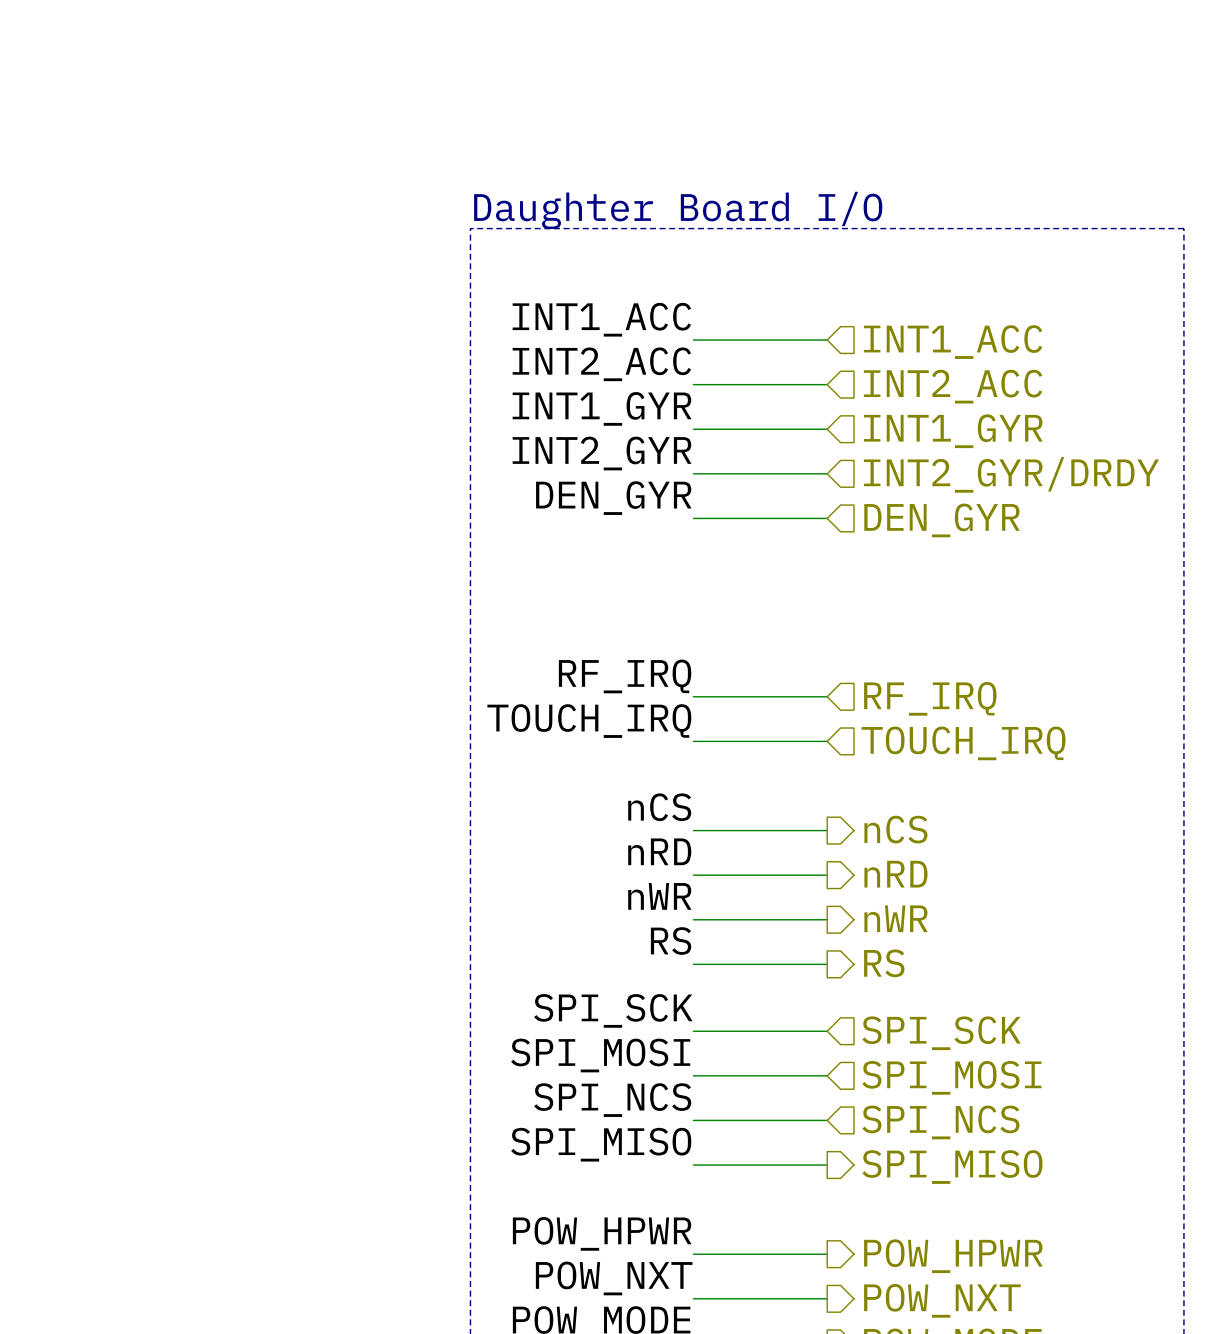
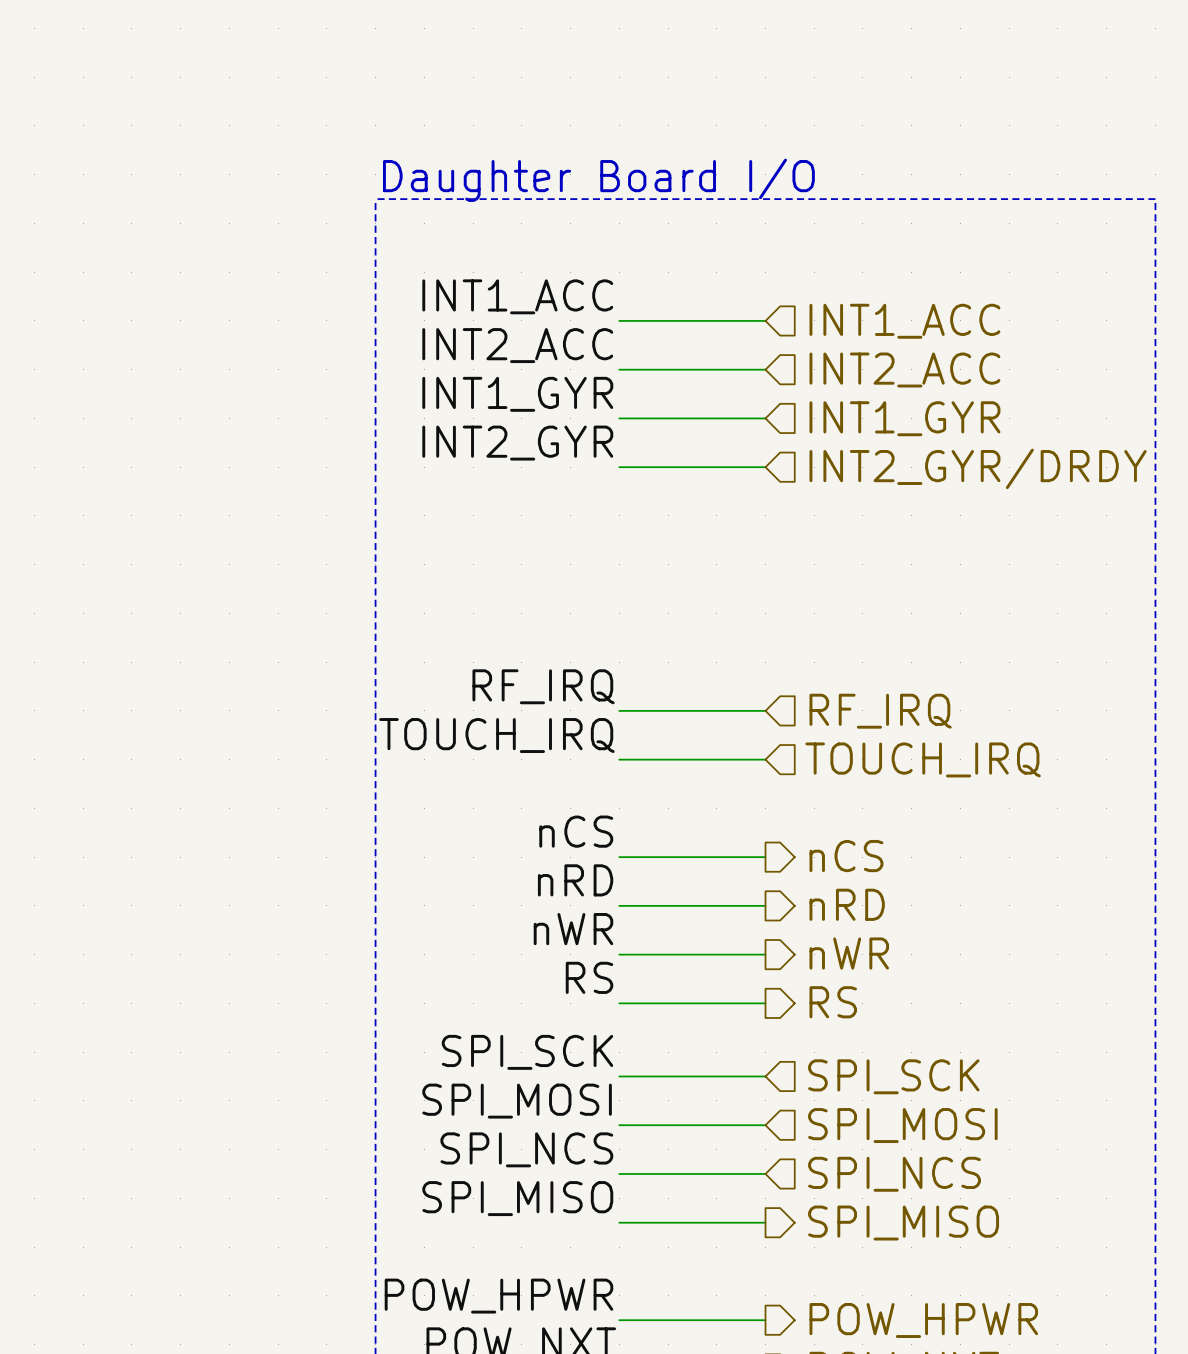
label: DEN_GYR (613, 498) -> none
wire: (693, 518) (827, 518) -> none
hierarchical label: DEN_GYR (942, 520) -> none

